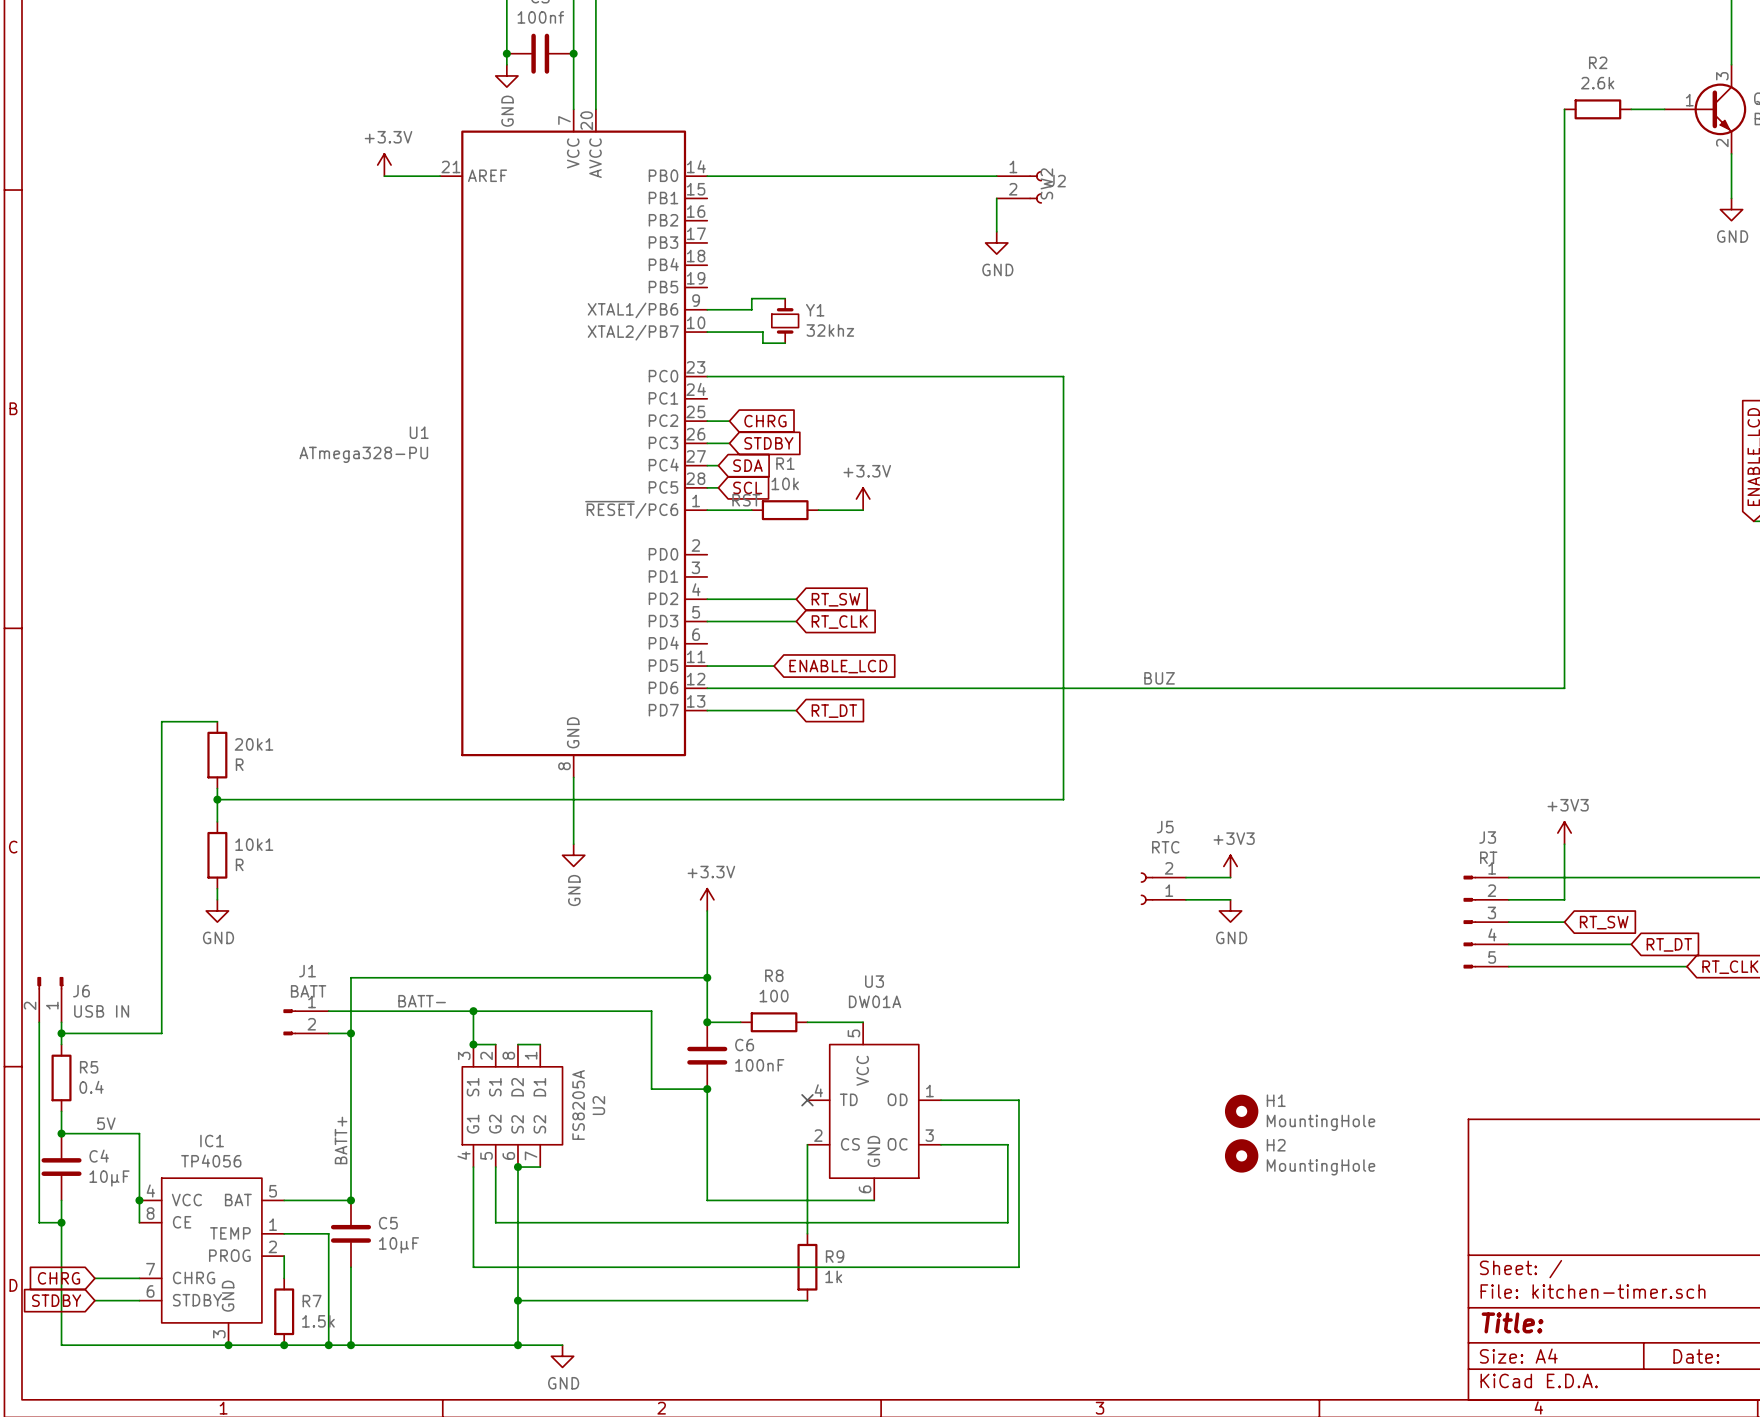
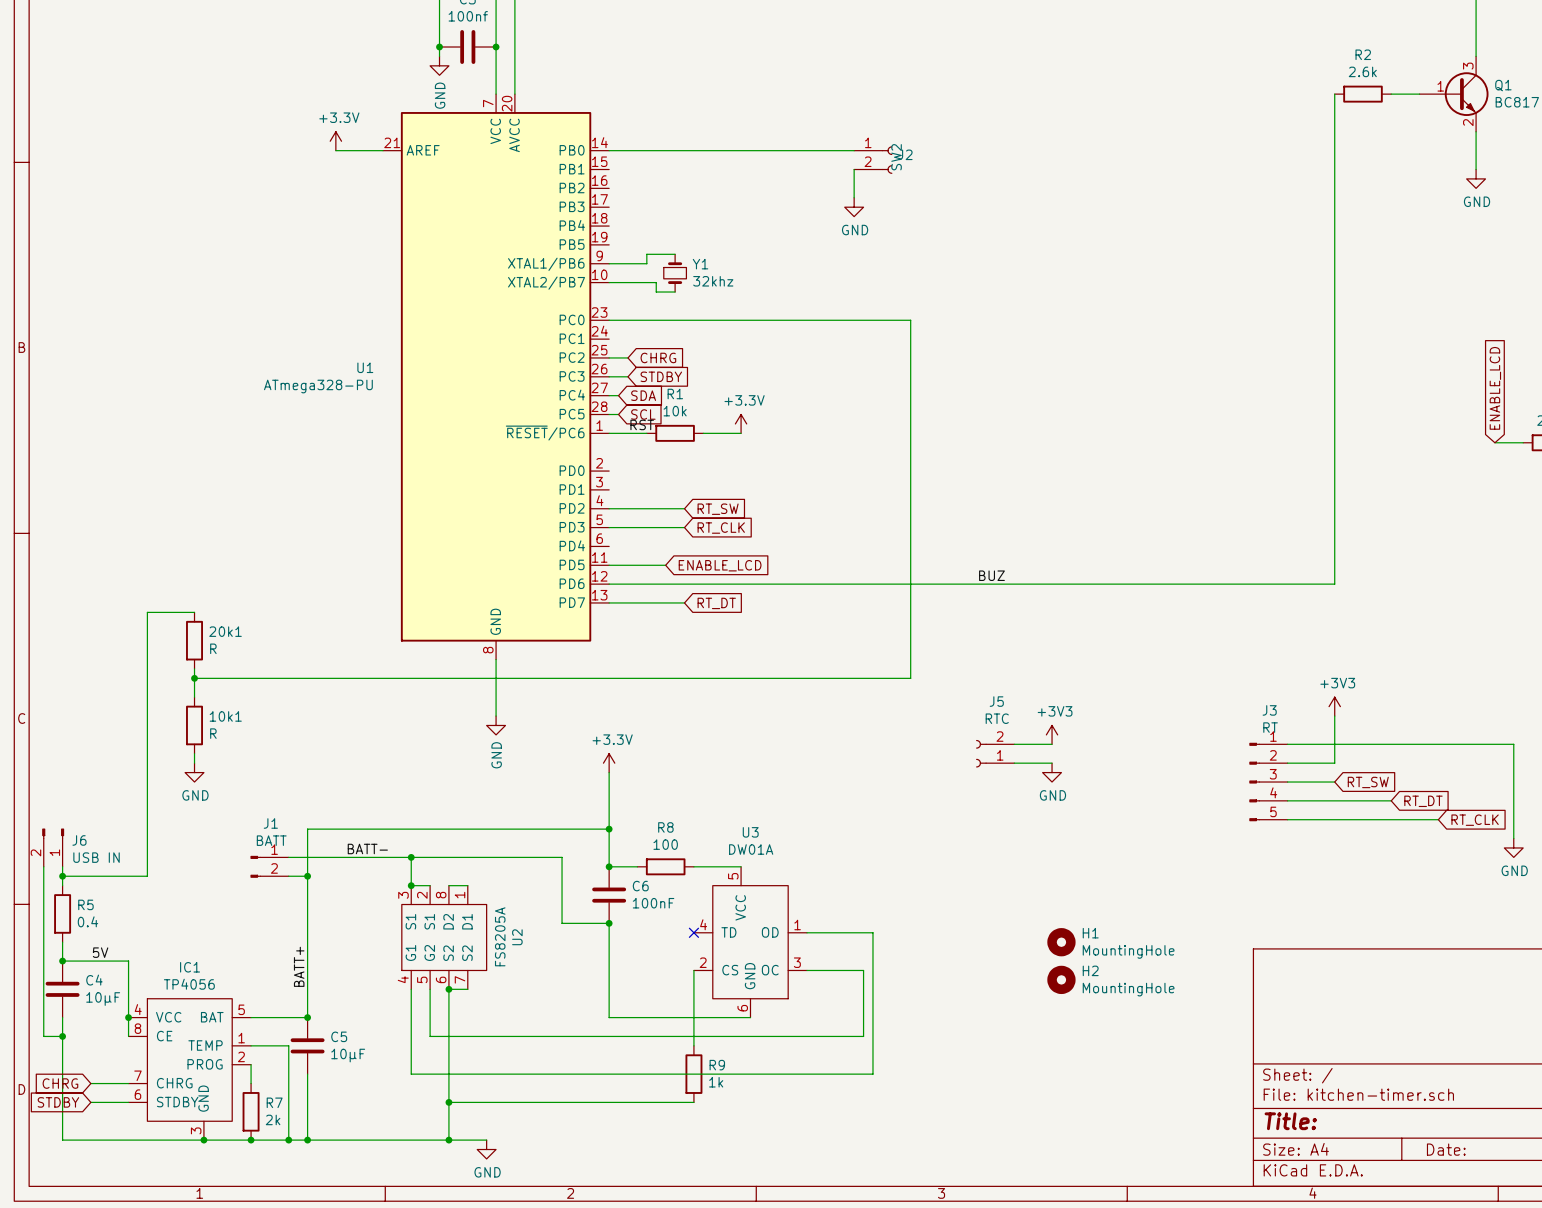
R7 value: 1.5k (318, 1321) -> 2k (273, 1119)

